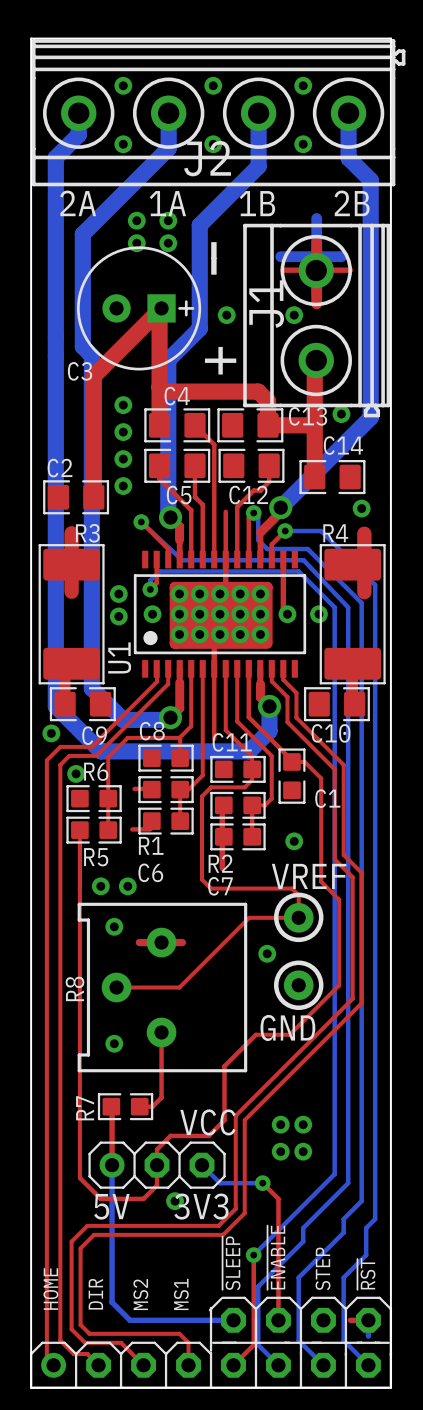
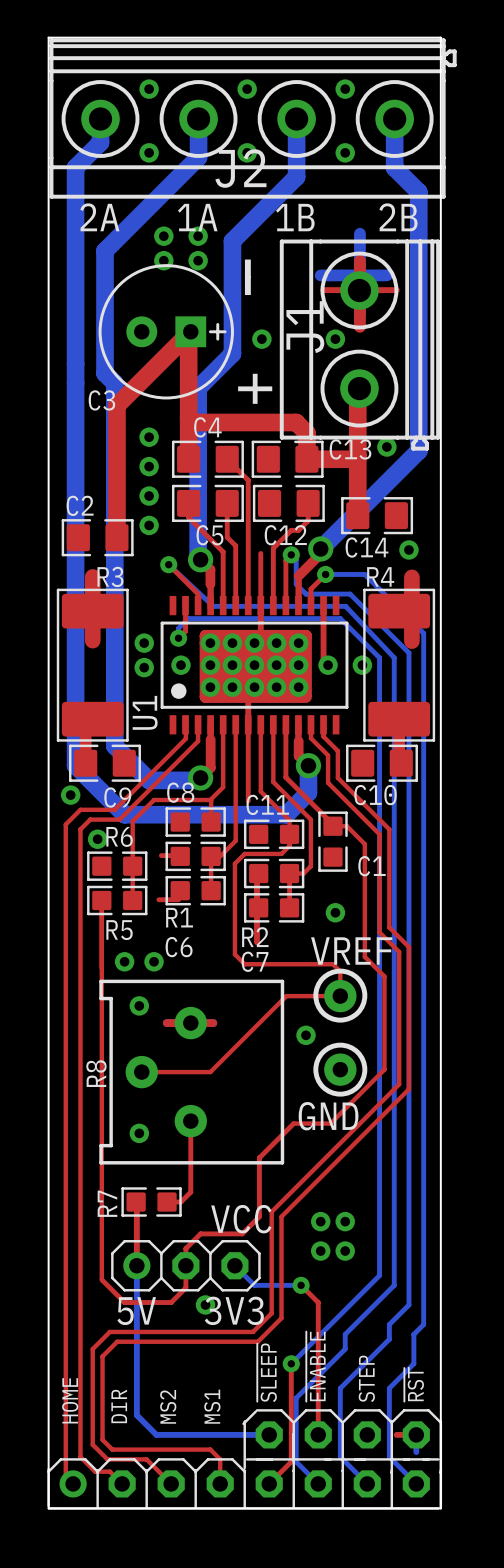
C14 name position: C14 (343, 445) -> C14 (367, 547)

